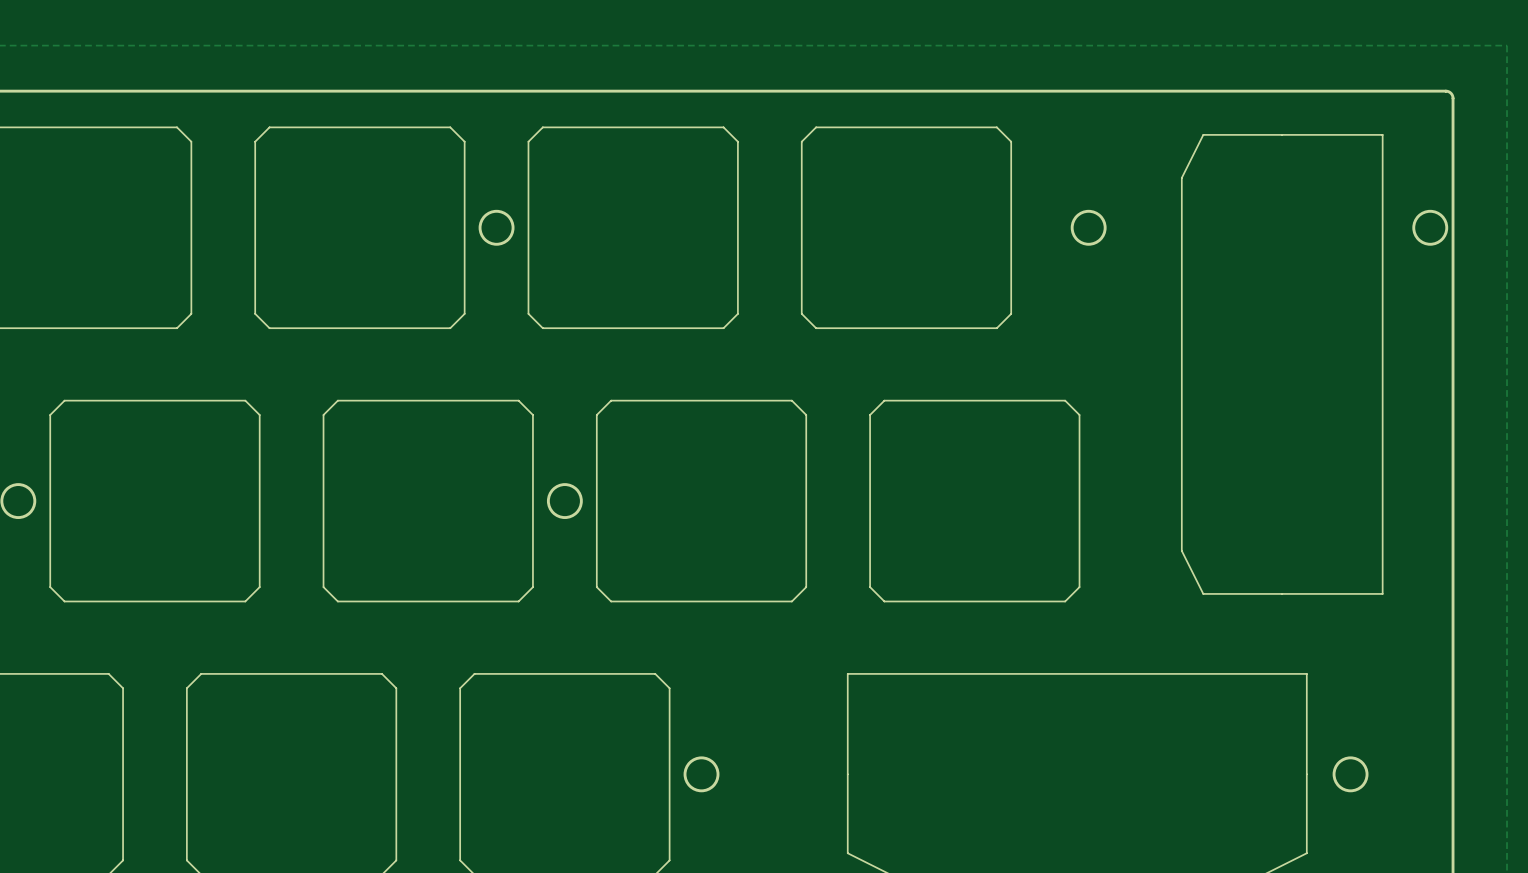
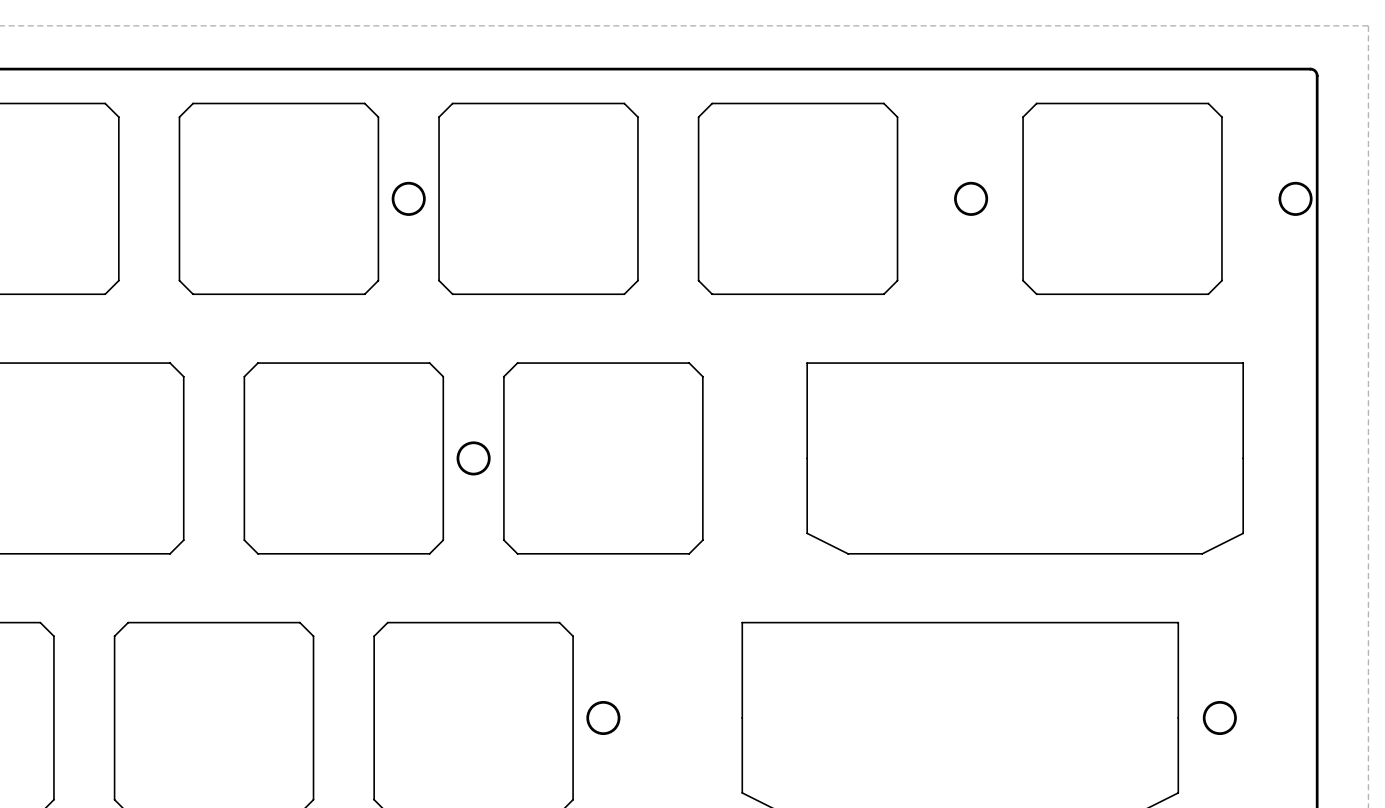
drawing: none -> [1022, 102, 1223, 296]
drawing: [1180, 134, 1384, 595] -> none
drawing: [869, 399, 1081, 603] -> none
drawing: none -> [806, 362, 1244, 555]

